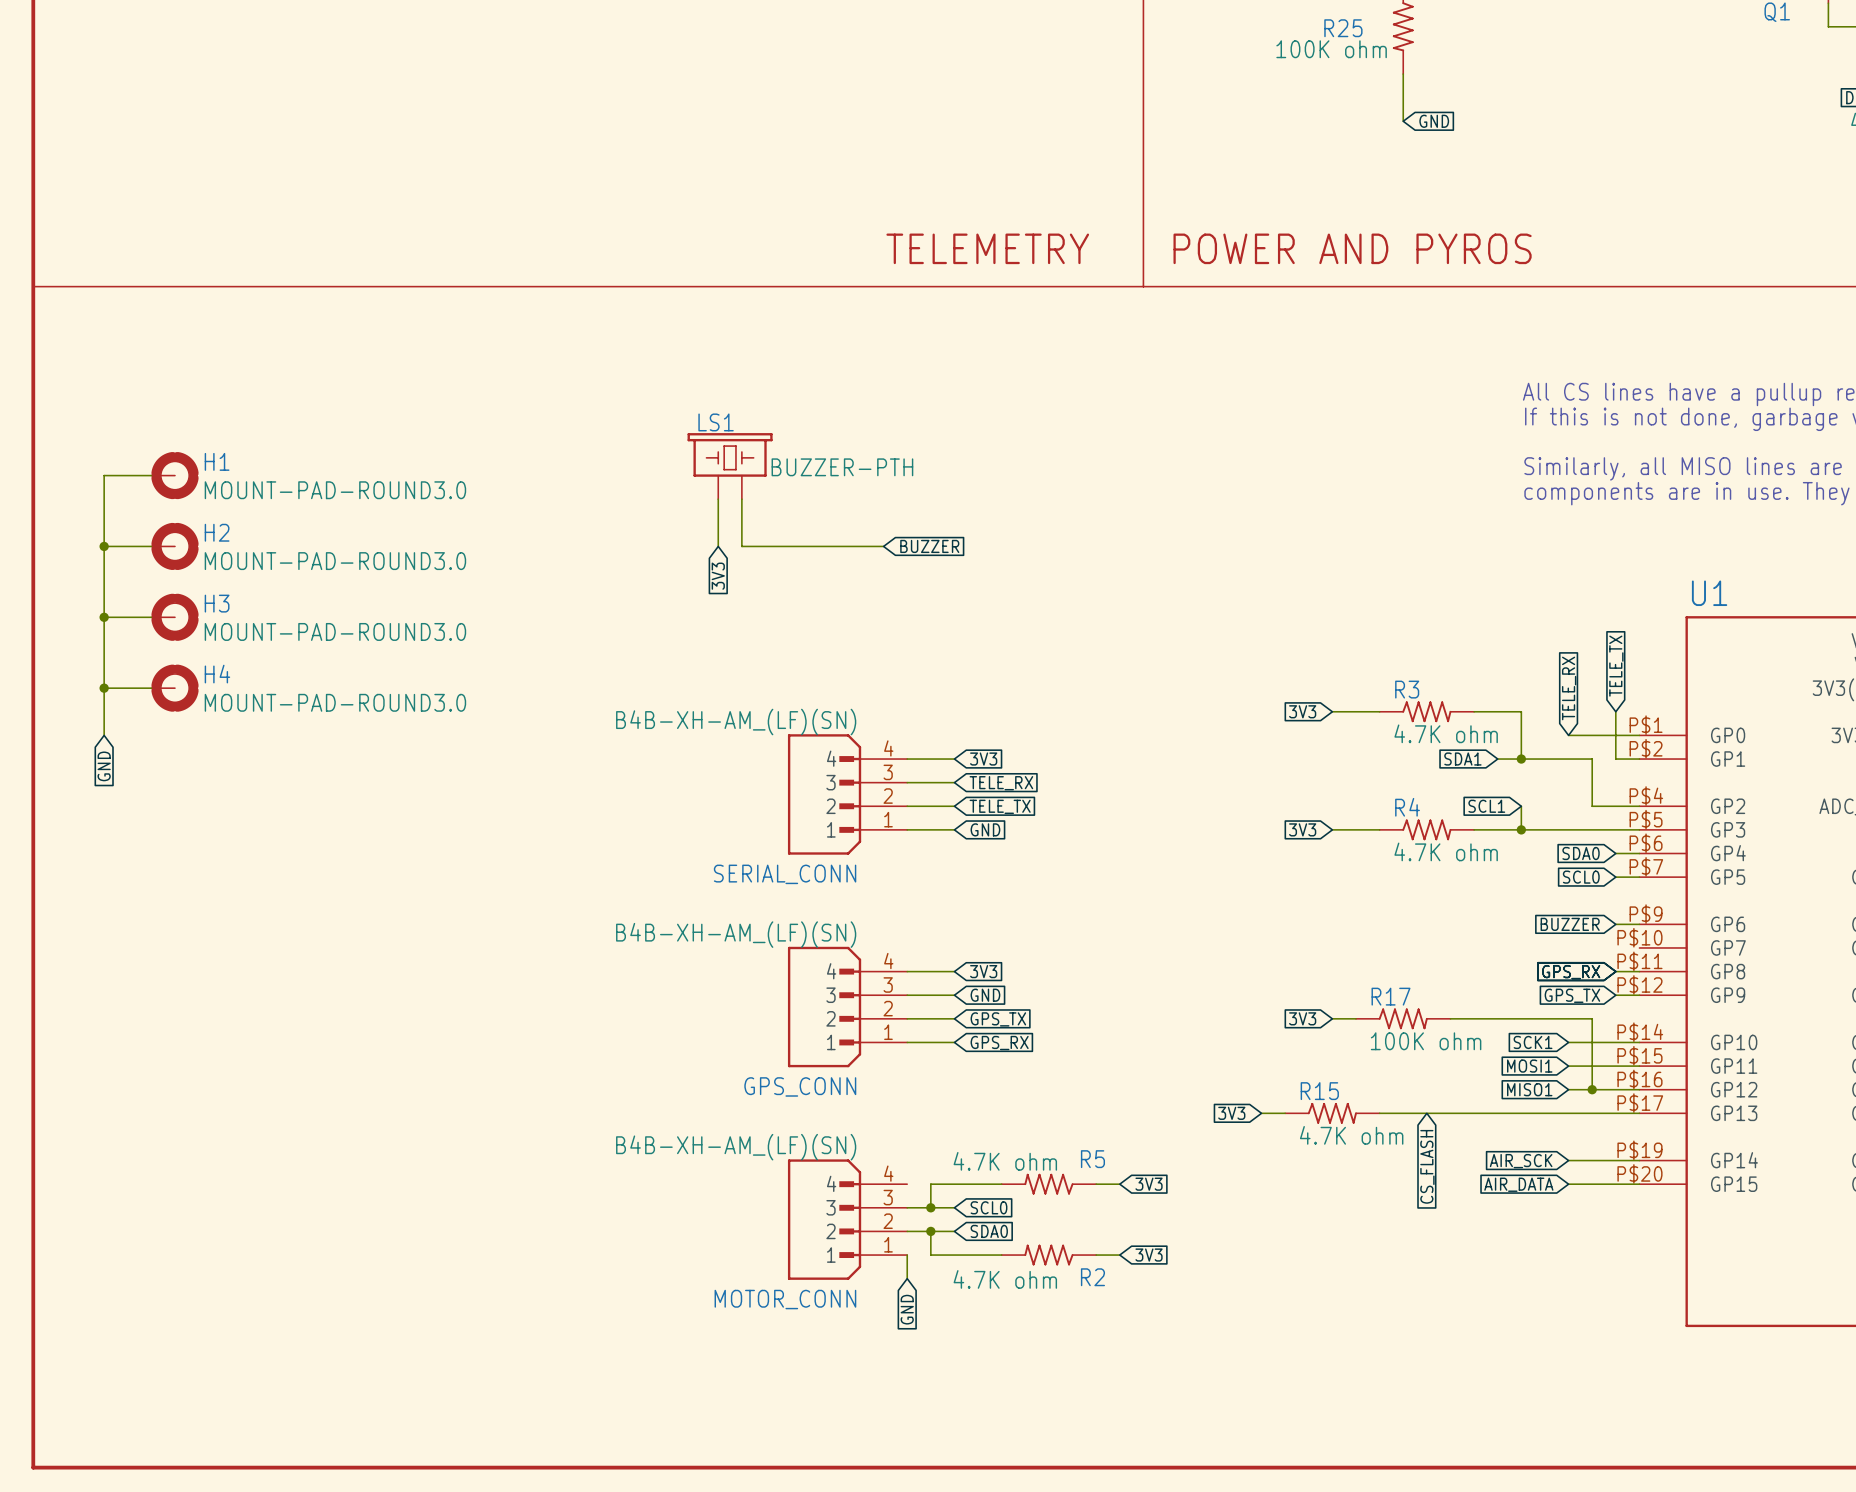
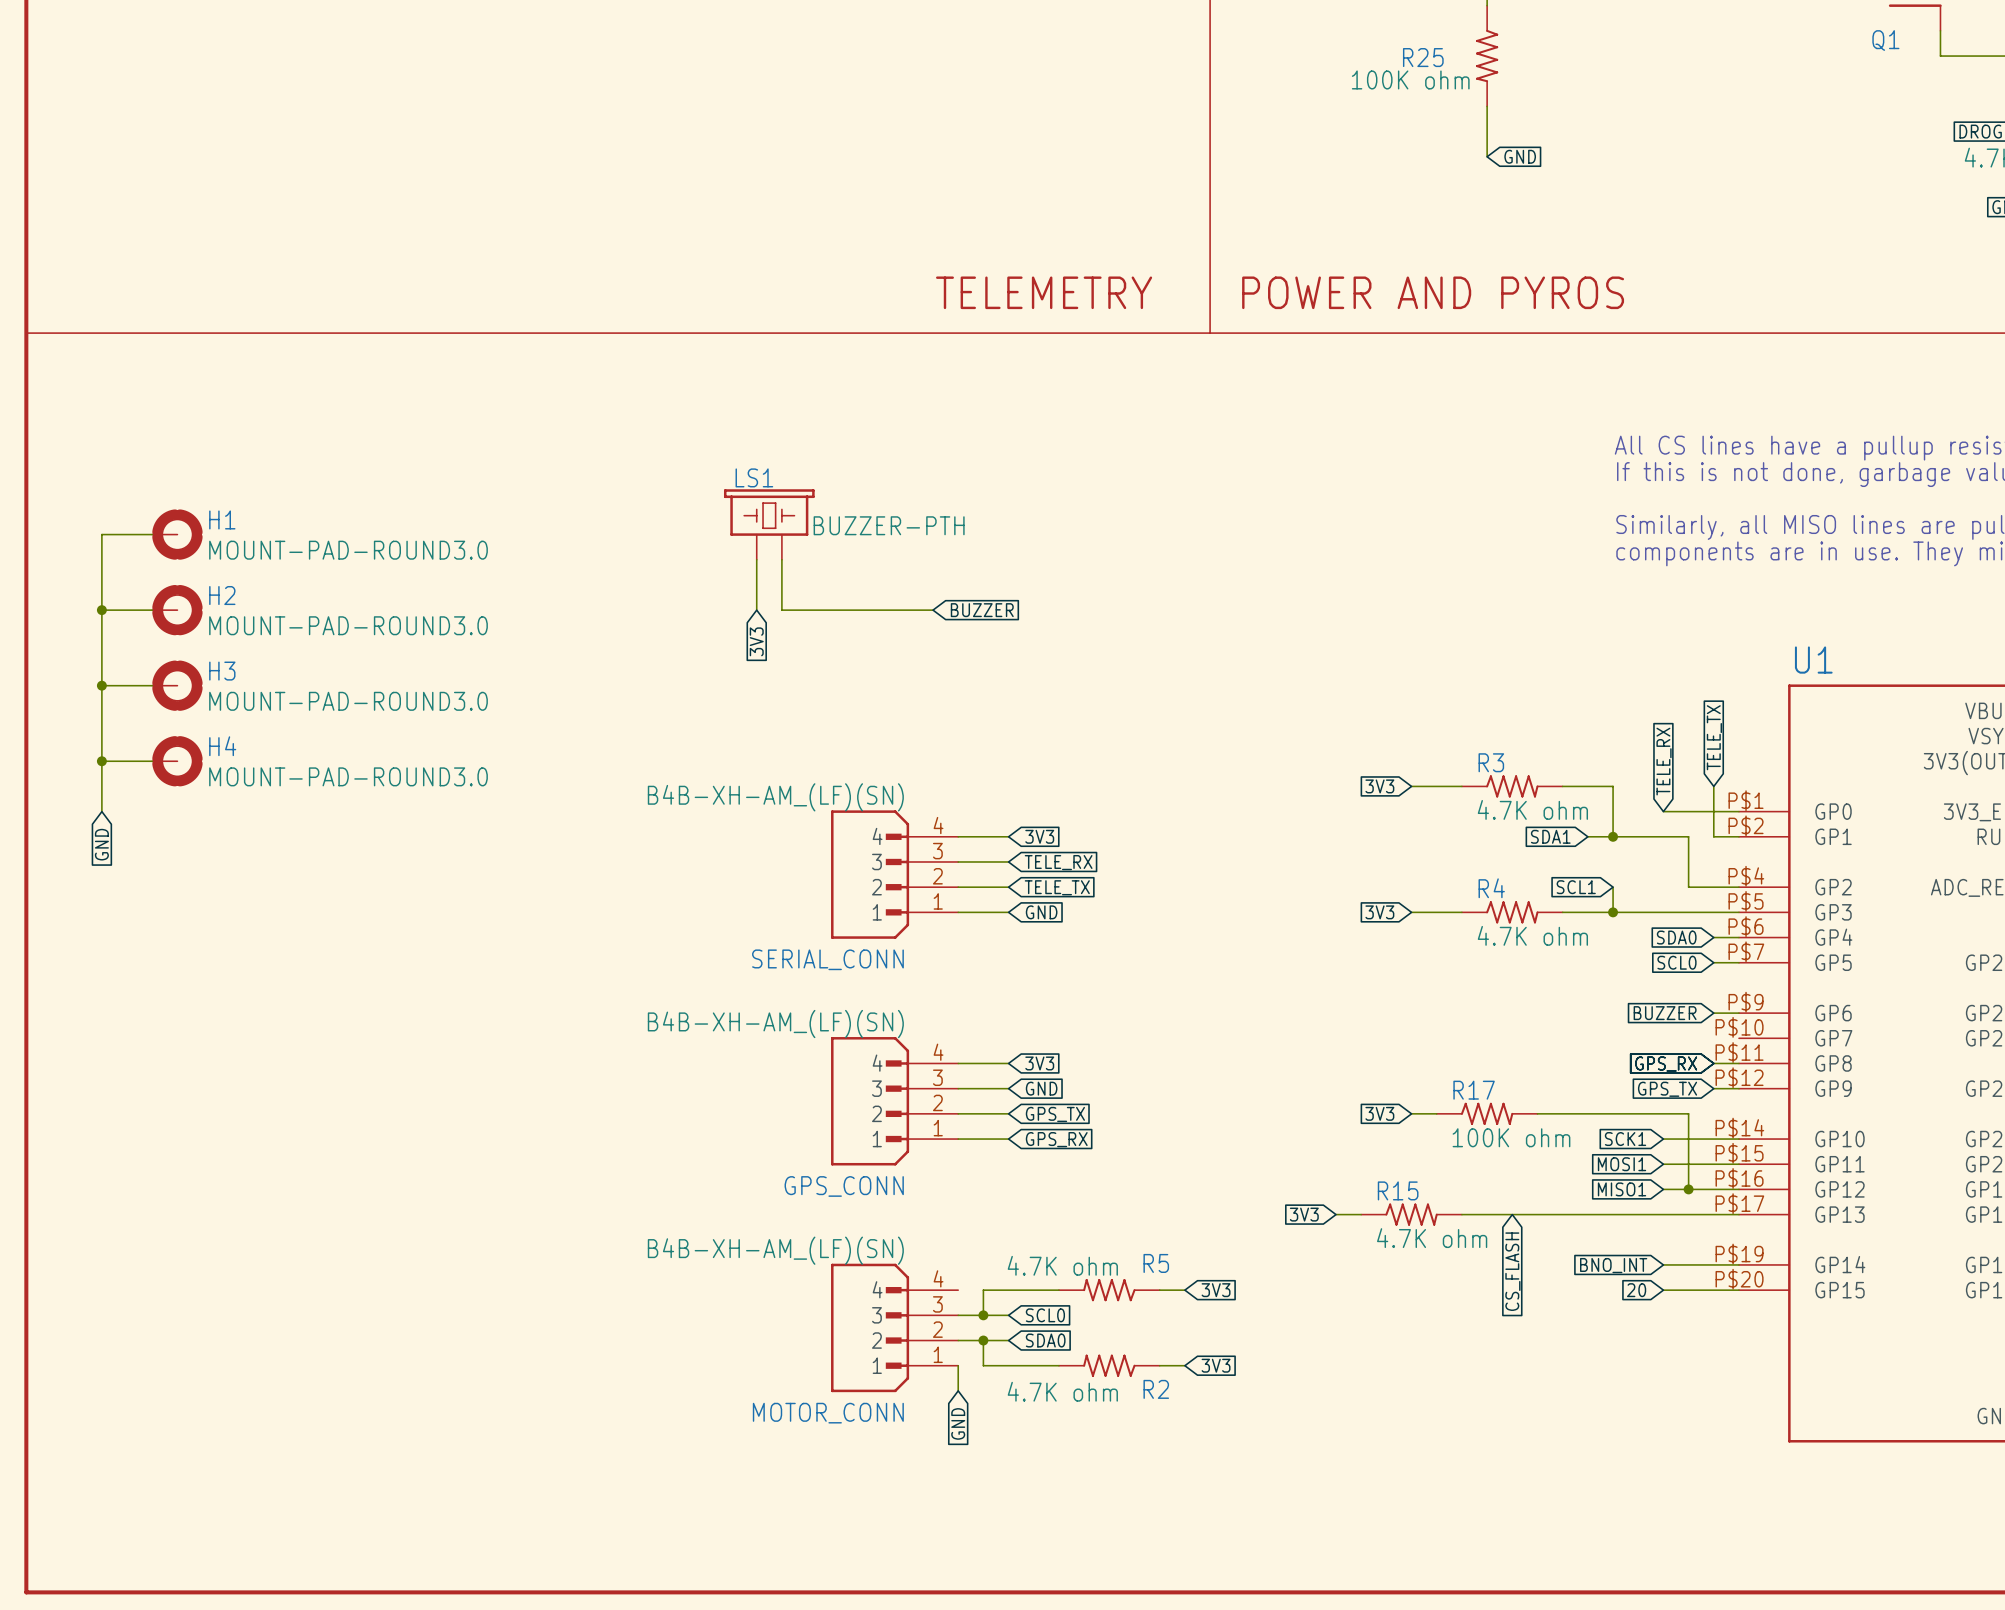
global label: AIR_SCK (1521, 1161) -> BNO_INT (1613, 1265)
global label: AIR_DATA (1518, 1184) -> 20 (1636, 1290)

